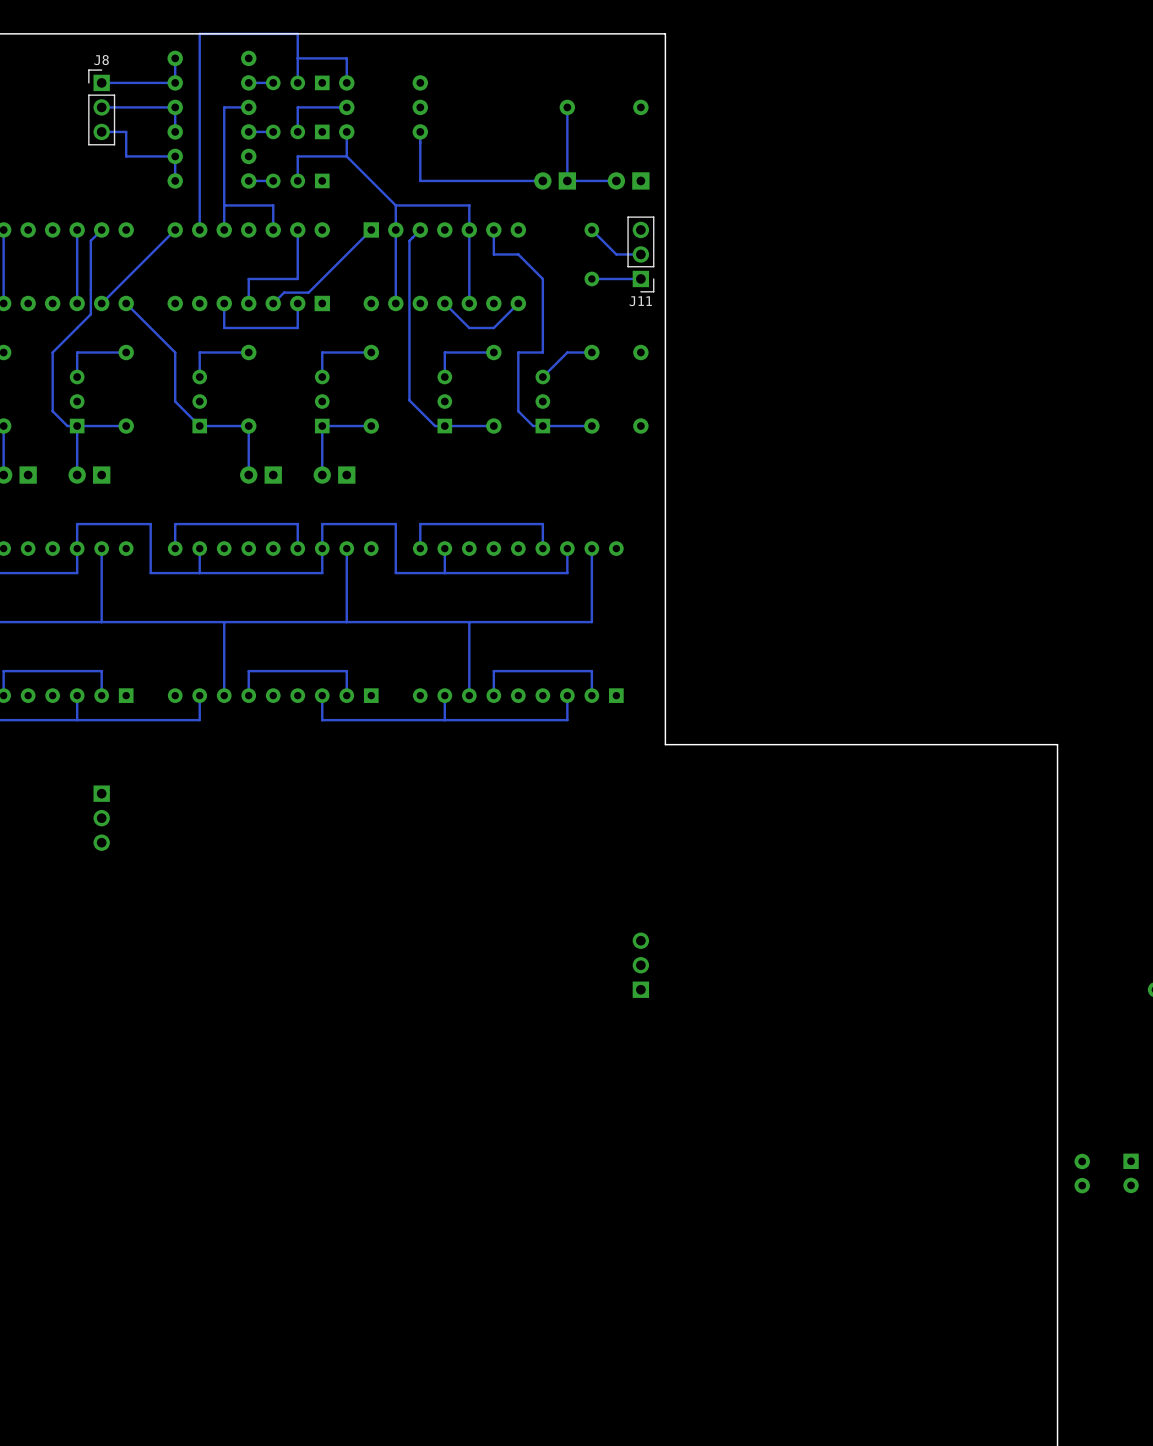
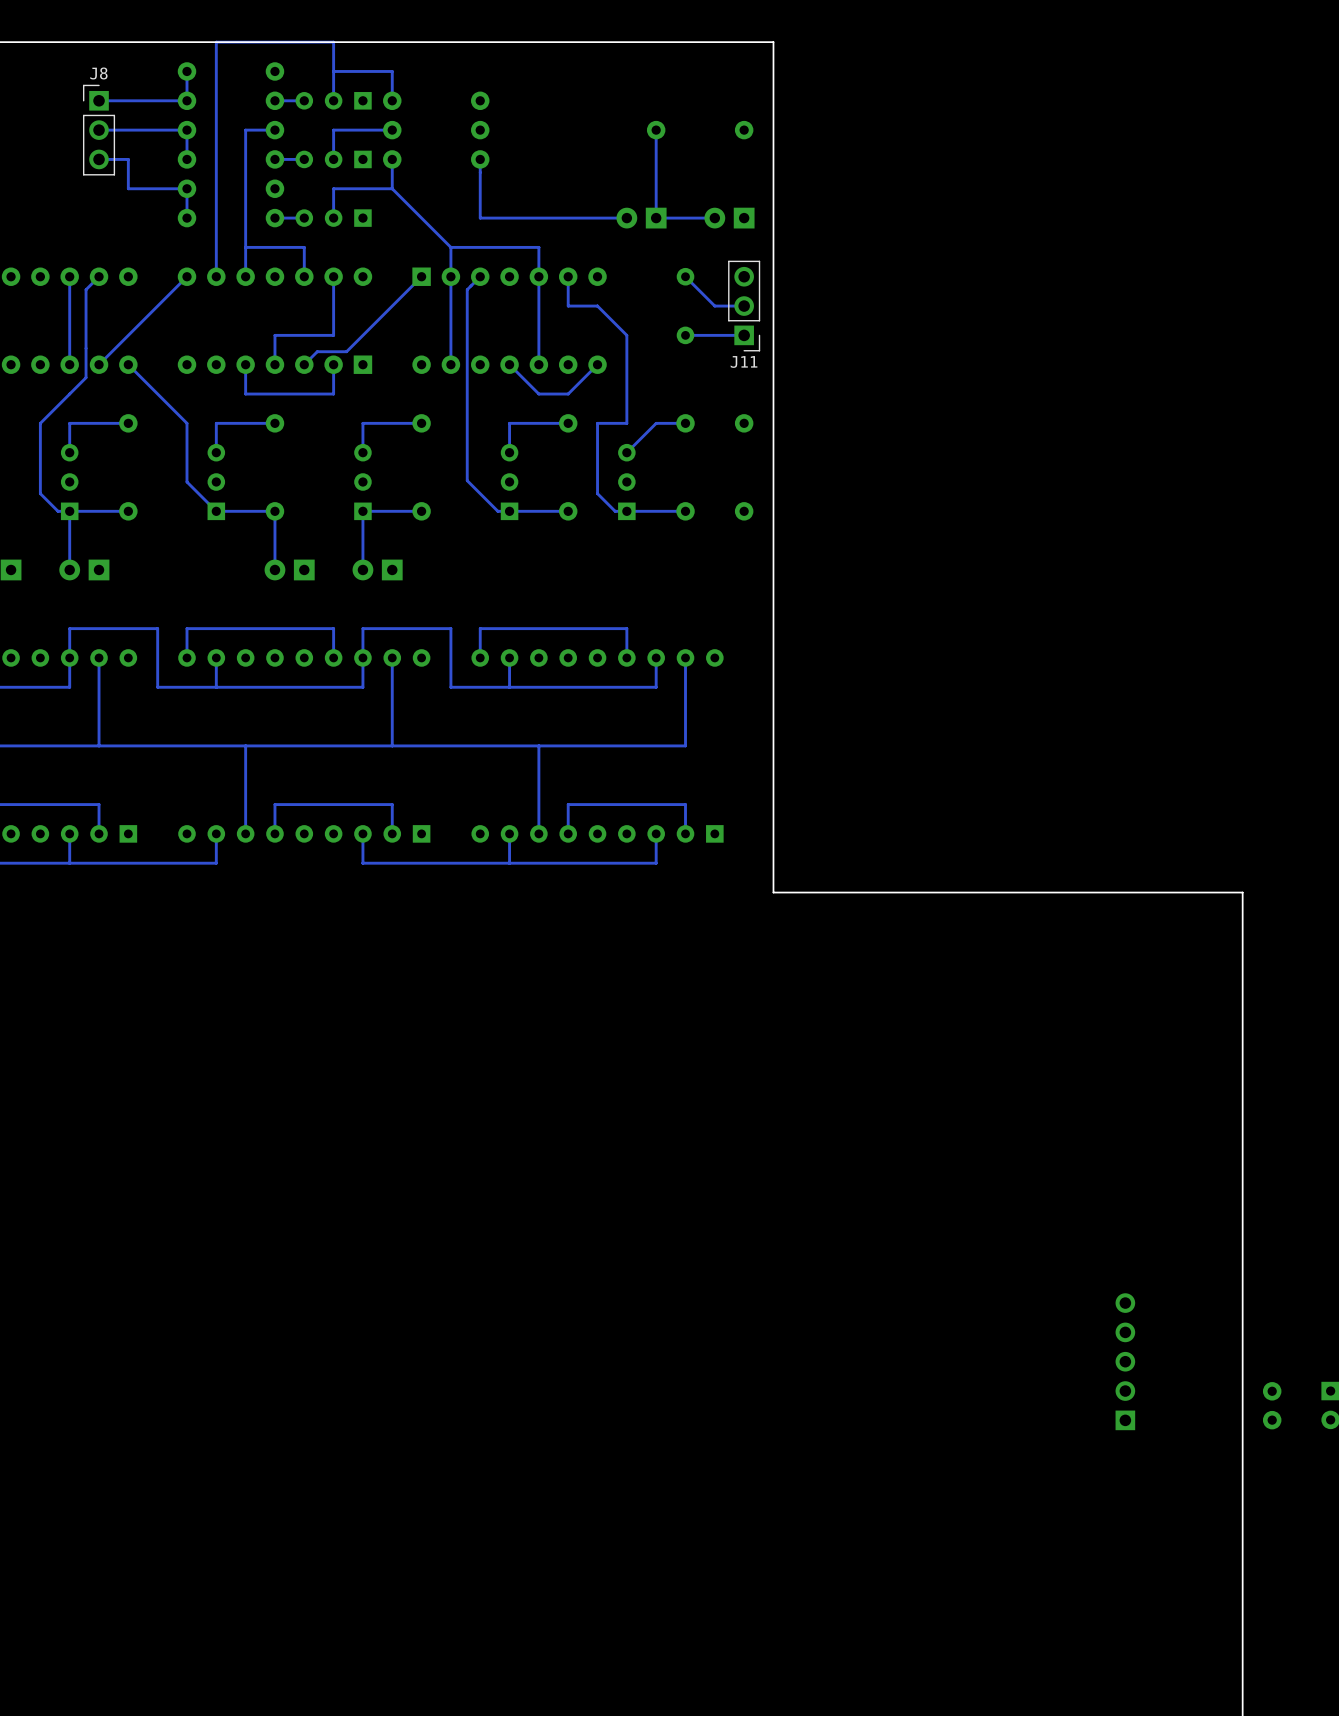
part: (101, 818) -> none
part: (640, 965) -> none
part: none -> (1125, 1361)

